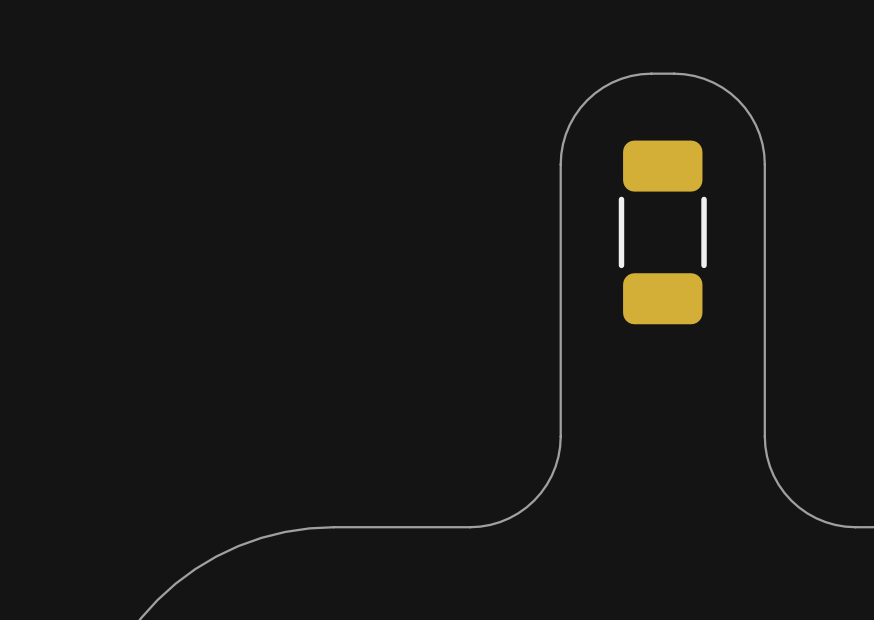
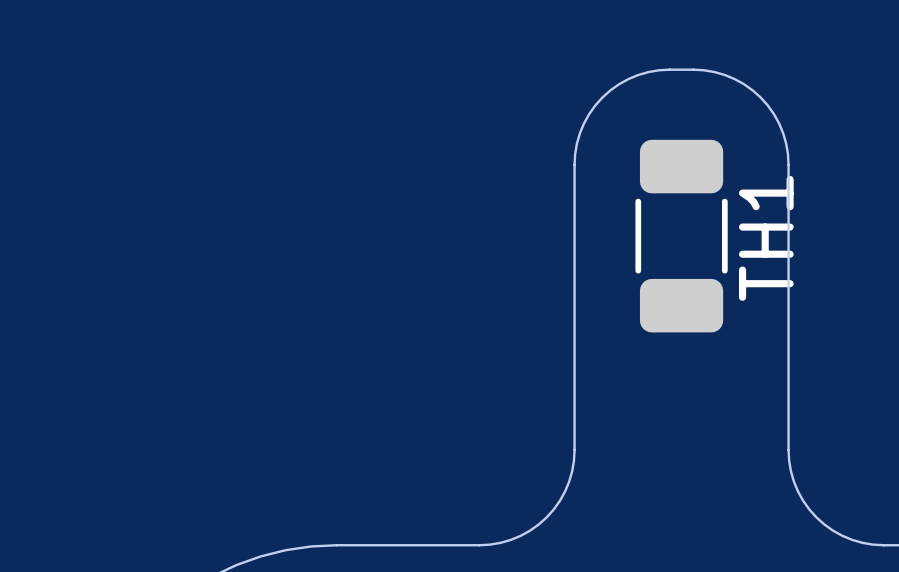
TH1 name: none -> TH1 (766, 238)

